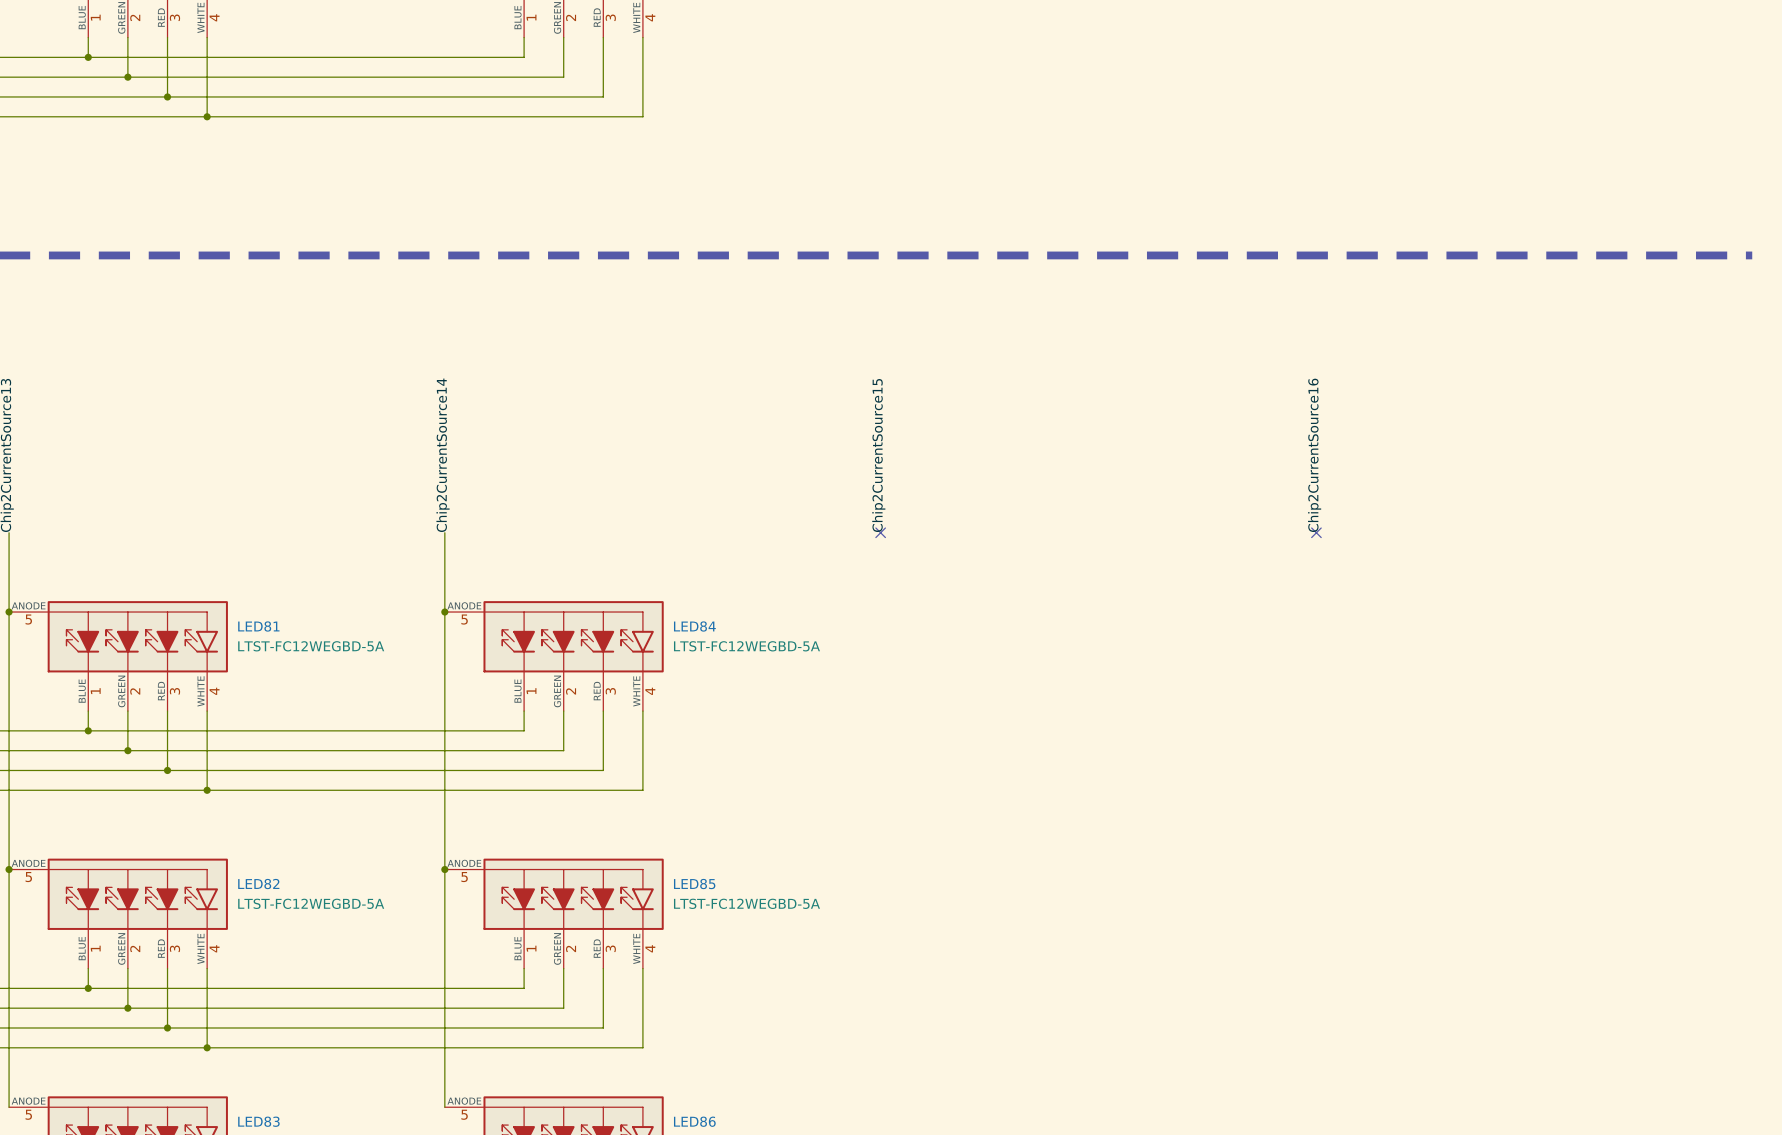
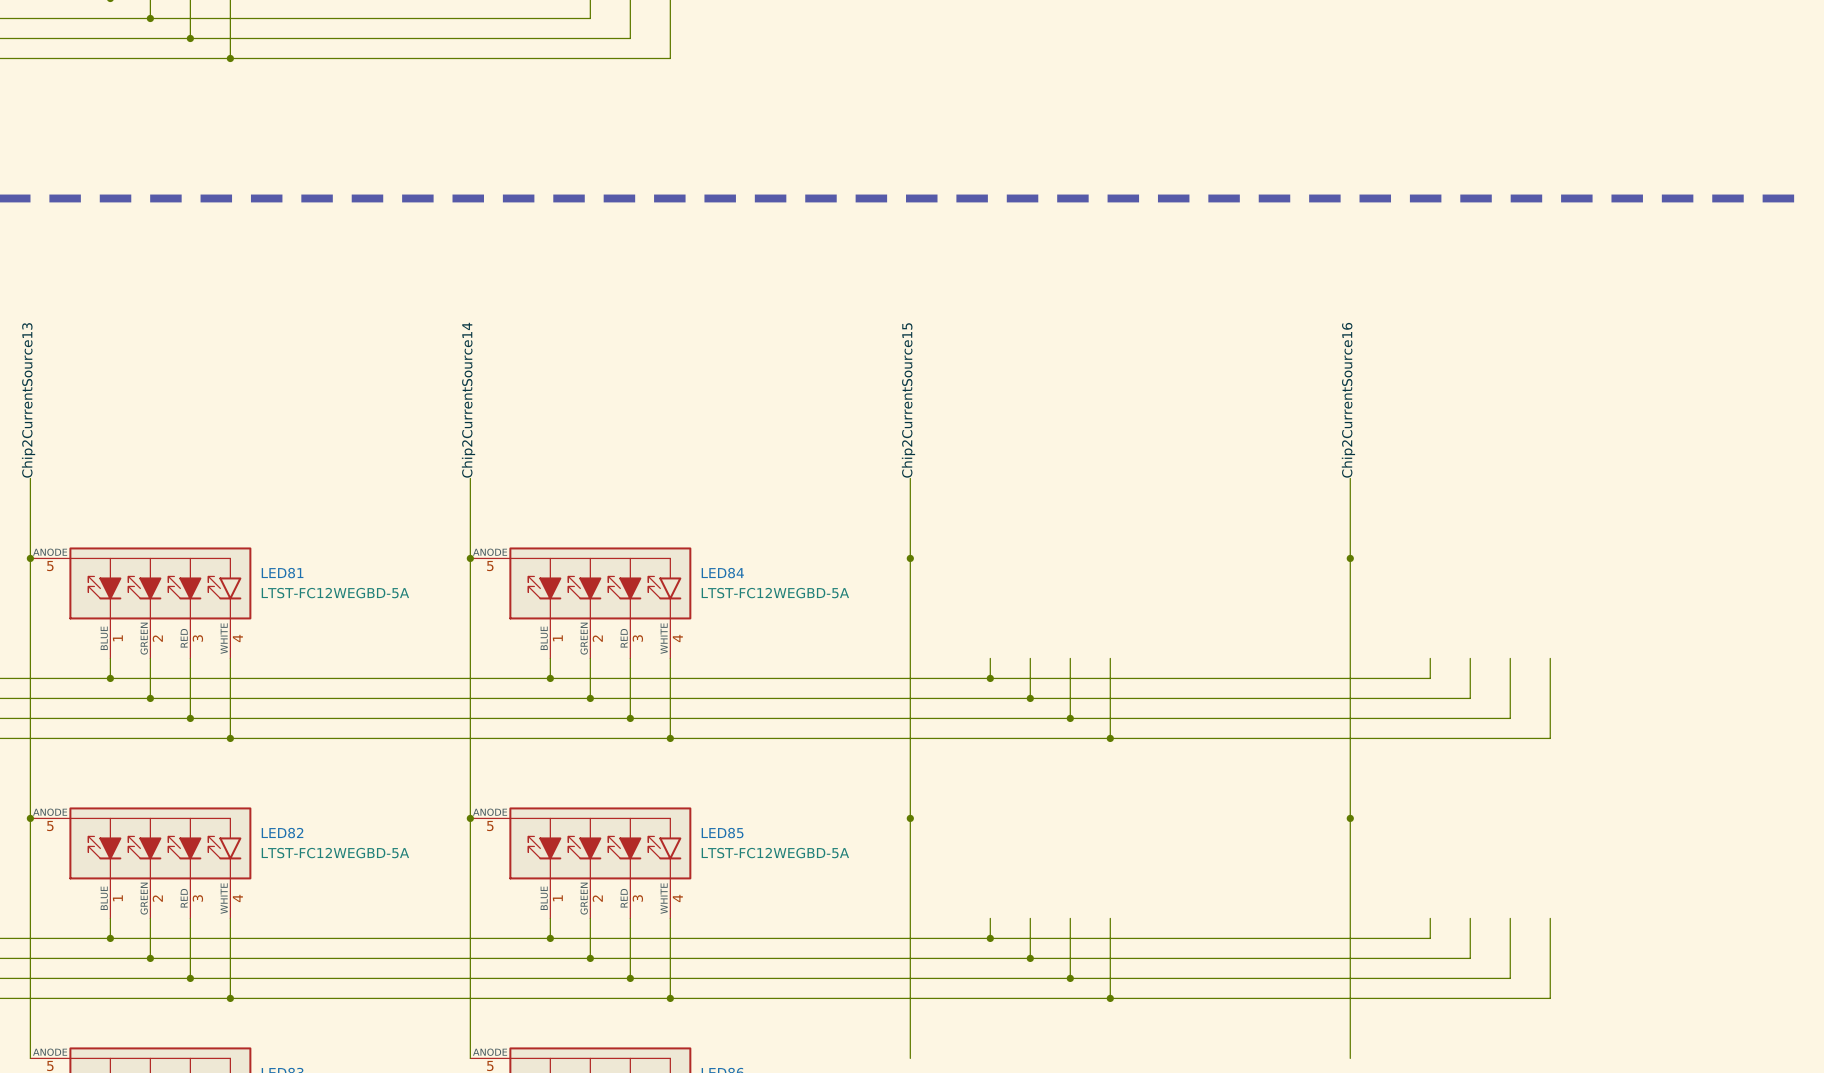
line: none -> (1790, 198) (1802, 198)
wire: none -> (910, 478) (910, 1058)
no-connect mark: (880, 532) -> none
wire: none -> (1350, 478) (1350, 1058)
no-connect mark: (1316, 532) -> none
junction: none -> (910, 558)
junction: none -> (1350, 558)
wire: none -> (990, 658) (990, 678)
wire: none -> (1030, 658) (1030, 698)
wire: none -> (1070, 658) (1070, 718)
wire: none -> (1110, 658) (1110, 738)
wire: none -> (1430, 658) (1430, 678) (550, 678)
wire: none -> (1470, 658) (1470, 698) (590, 698)
wire: none -> (1510, 658) (1510, 718) (630, 718)
wire: none -> (1550, 658) (1550, 738) (670, 738)
junction: none -> (550, 678)
junction: none -> (990, 678)
junction: none -> (590, 698)
junction: none -> (1030, 698)
junction: none -> (630, 718)
junction: none -> (1070, 718)
junction: none -> (670, 738)
junction: none -> (1110, 738)
junction: none -> (910, 818)
junction: none -> (1350, 818)
wire: none -> (990, 918) (990, 938)
wire: none -> (1030, 918) (1030, 958)
wire: none -> (1070, 918) (1070, 978)
wire: none -> (1110, 918) (1110, 998)
wire: none -> (1430, 918) (1430, 938) (550, 938)
wire: none -> (1470, 918) (1470, 958) (590, 958)
wire: none -> (1510, 918) (1510, 978) (630, 978)
wire: none -> (1550, 918) (1550, 998) (670, 998)
junction: none -> (550, 938)
junction: none -> (990, 938)
junction: none -> (590, 958)
junction: none -> (1030, 958)
junction: none -> (630, 978)
junction: none -> (1070, 978)
junction: none -> (670, 998)
junction: none -> (1110, 998)

